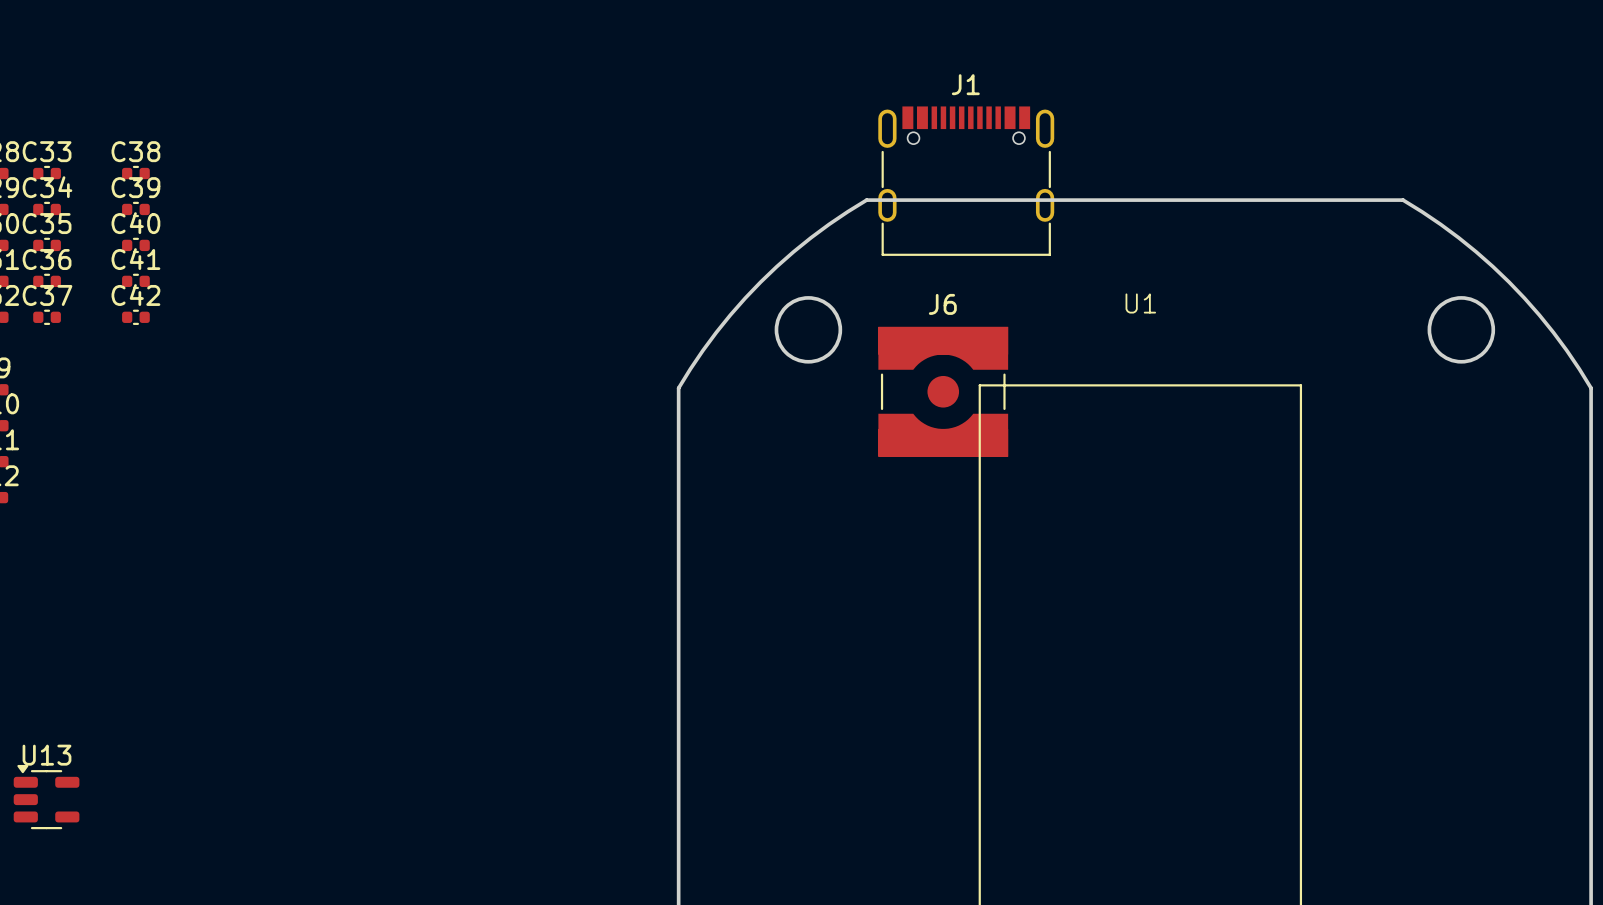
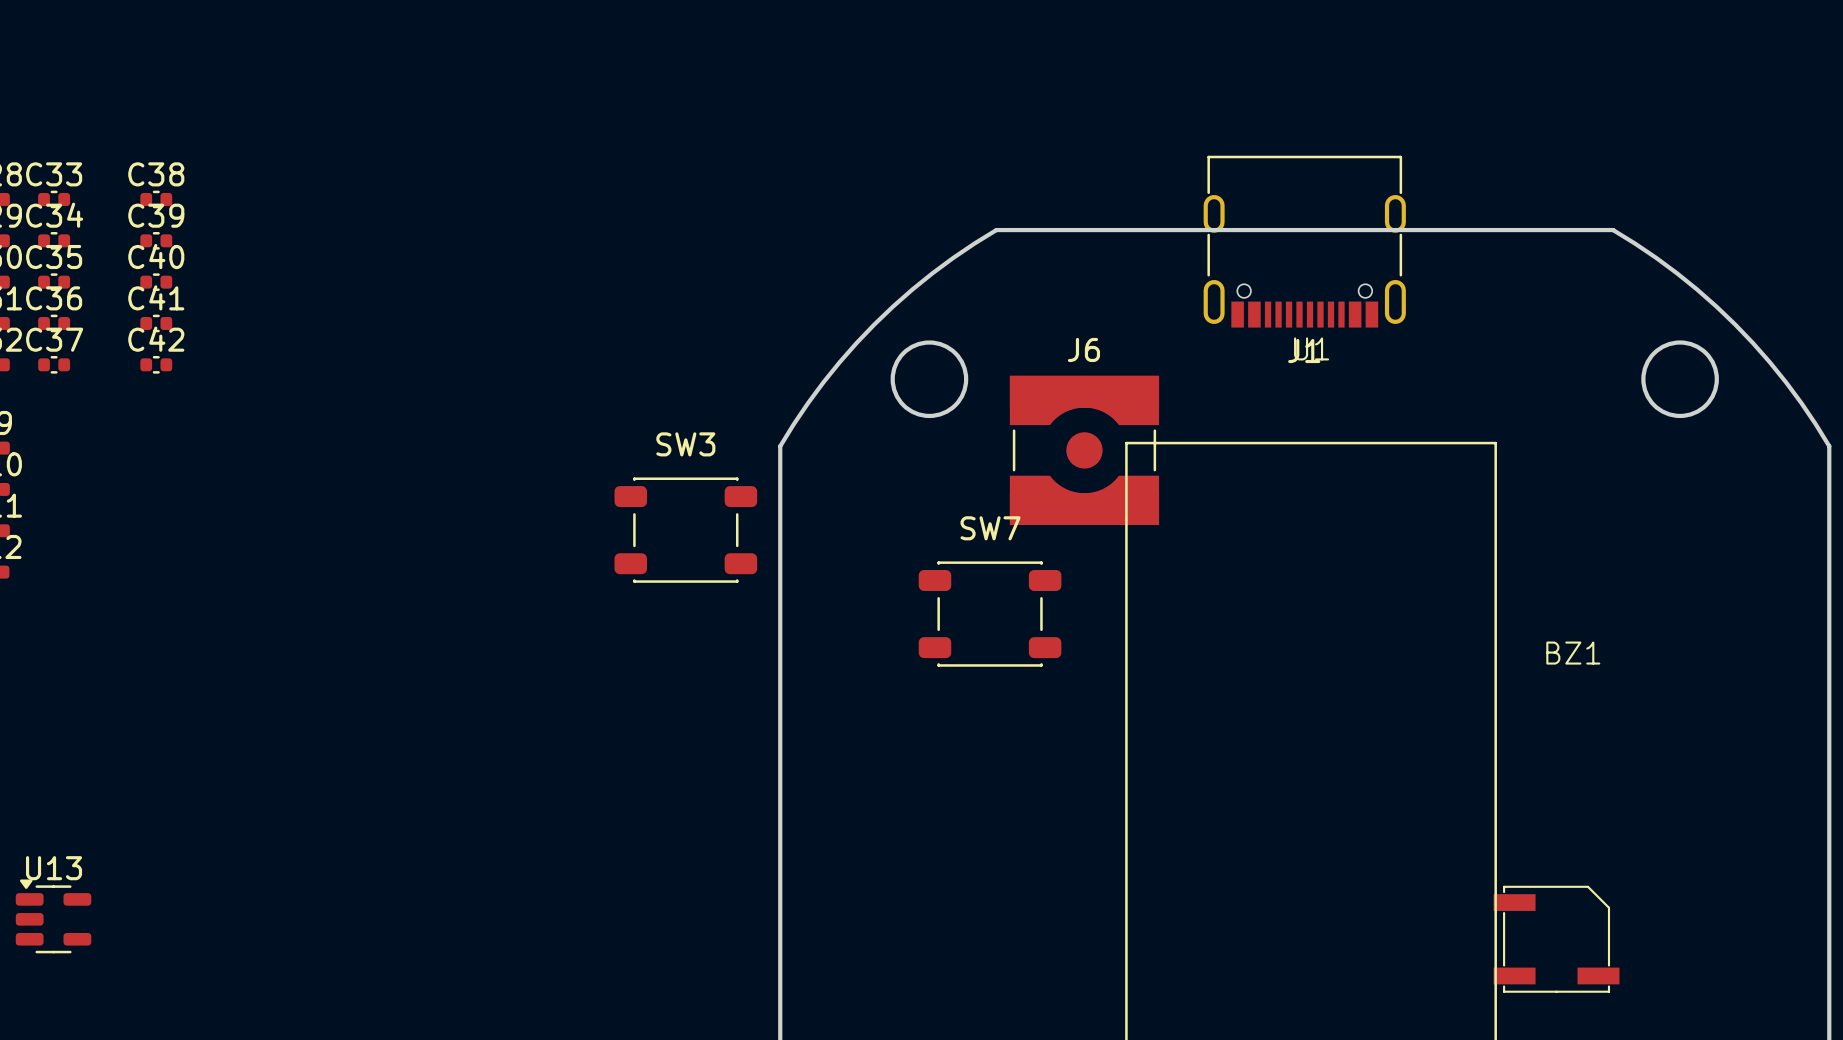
J1 rotation: 0° (966, 181) -> 180° (1304, 241)
J1 position: (966, 181) -> (1304, 241)
SW3: none -> (685, 530)
SW7: none -> (990, 614)
BZ1: none -> (1556, 939)

